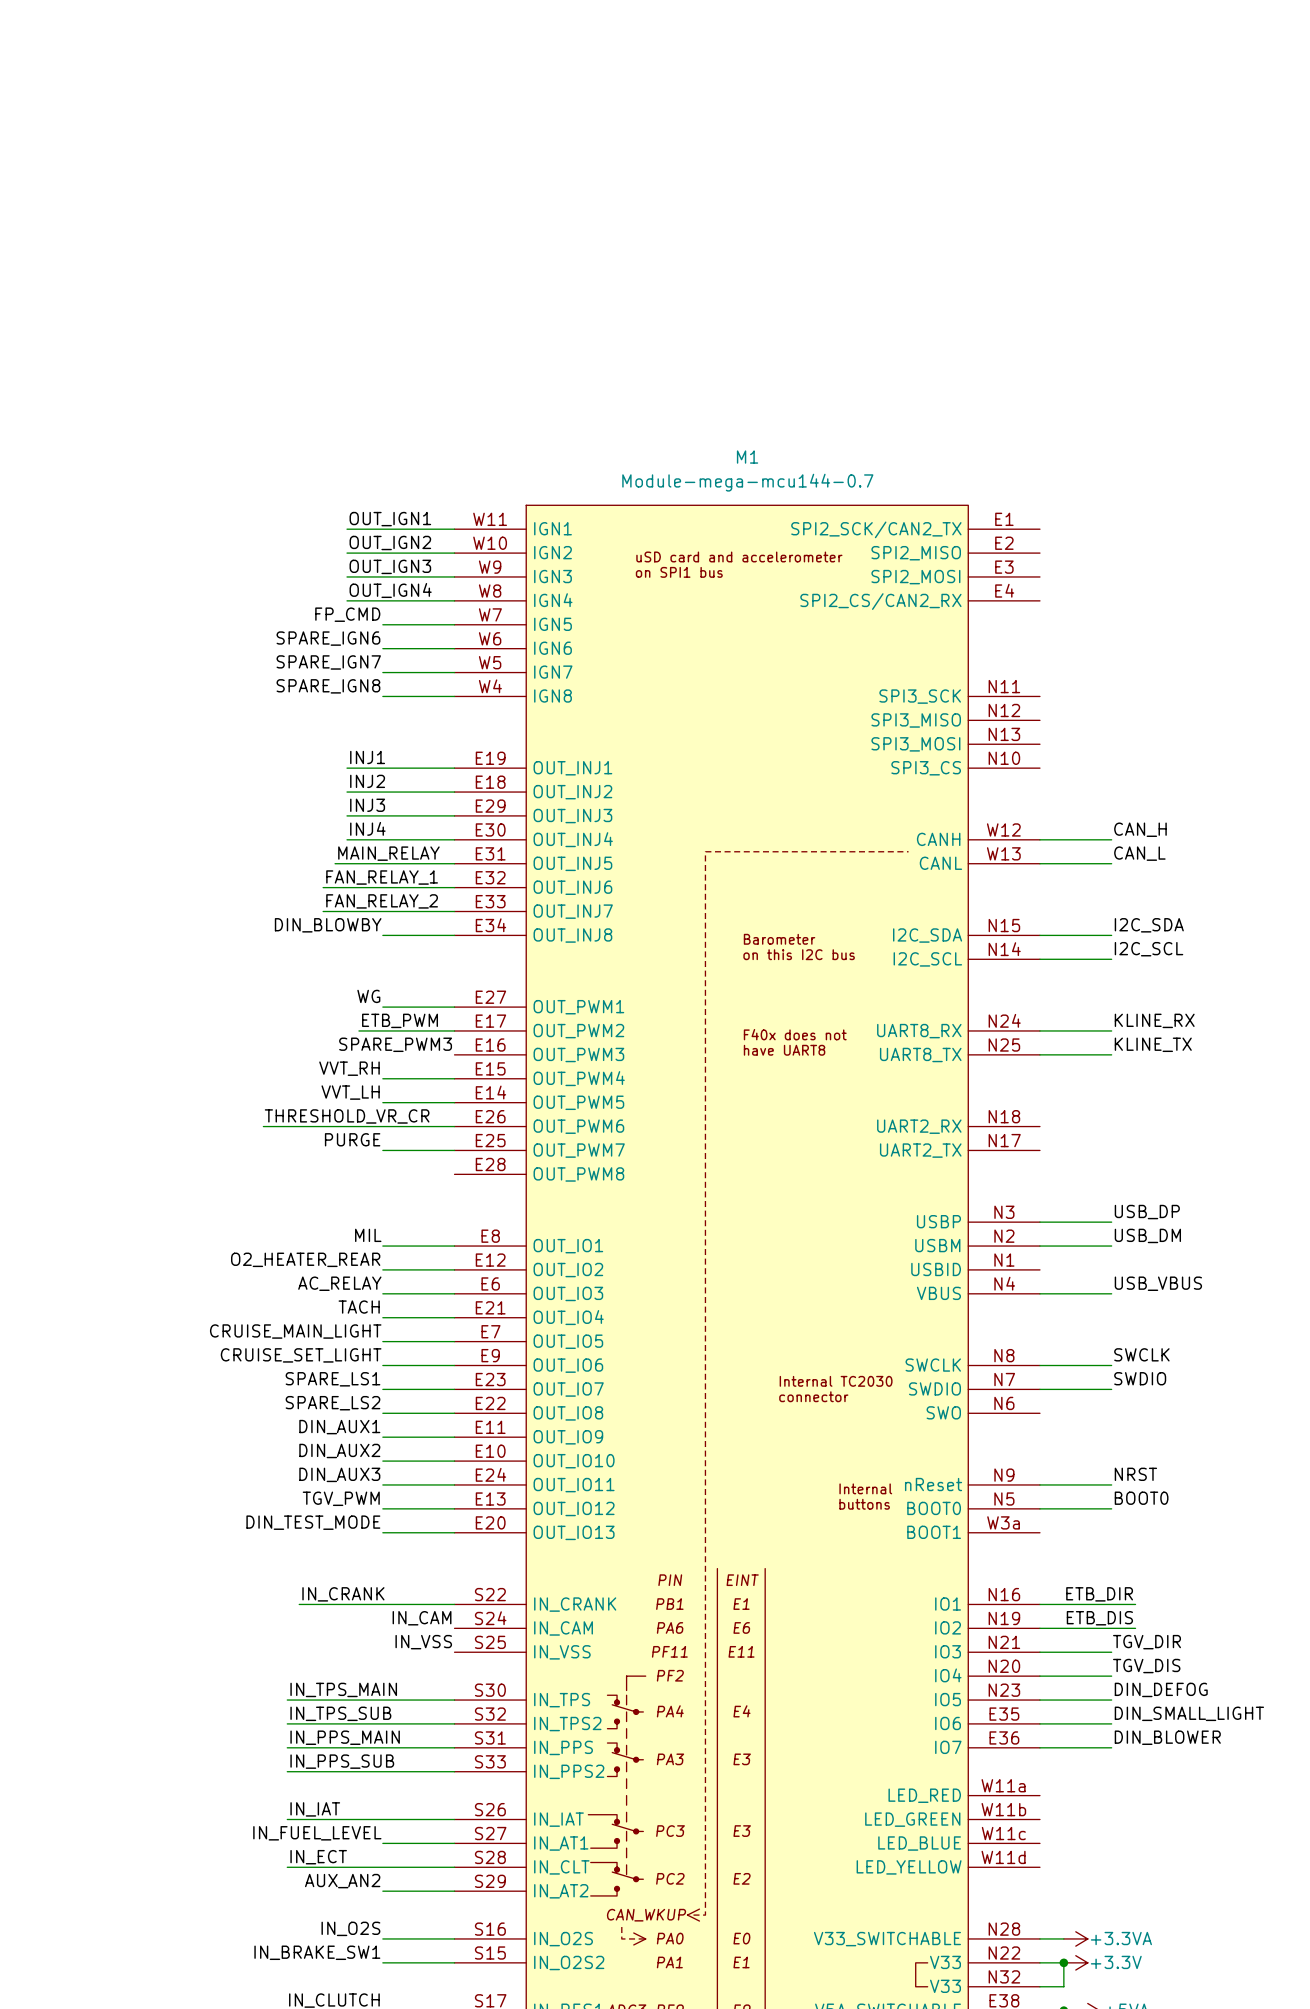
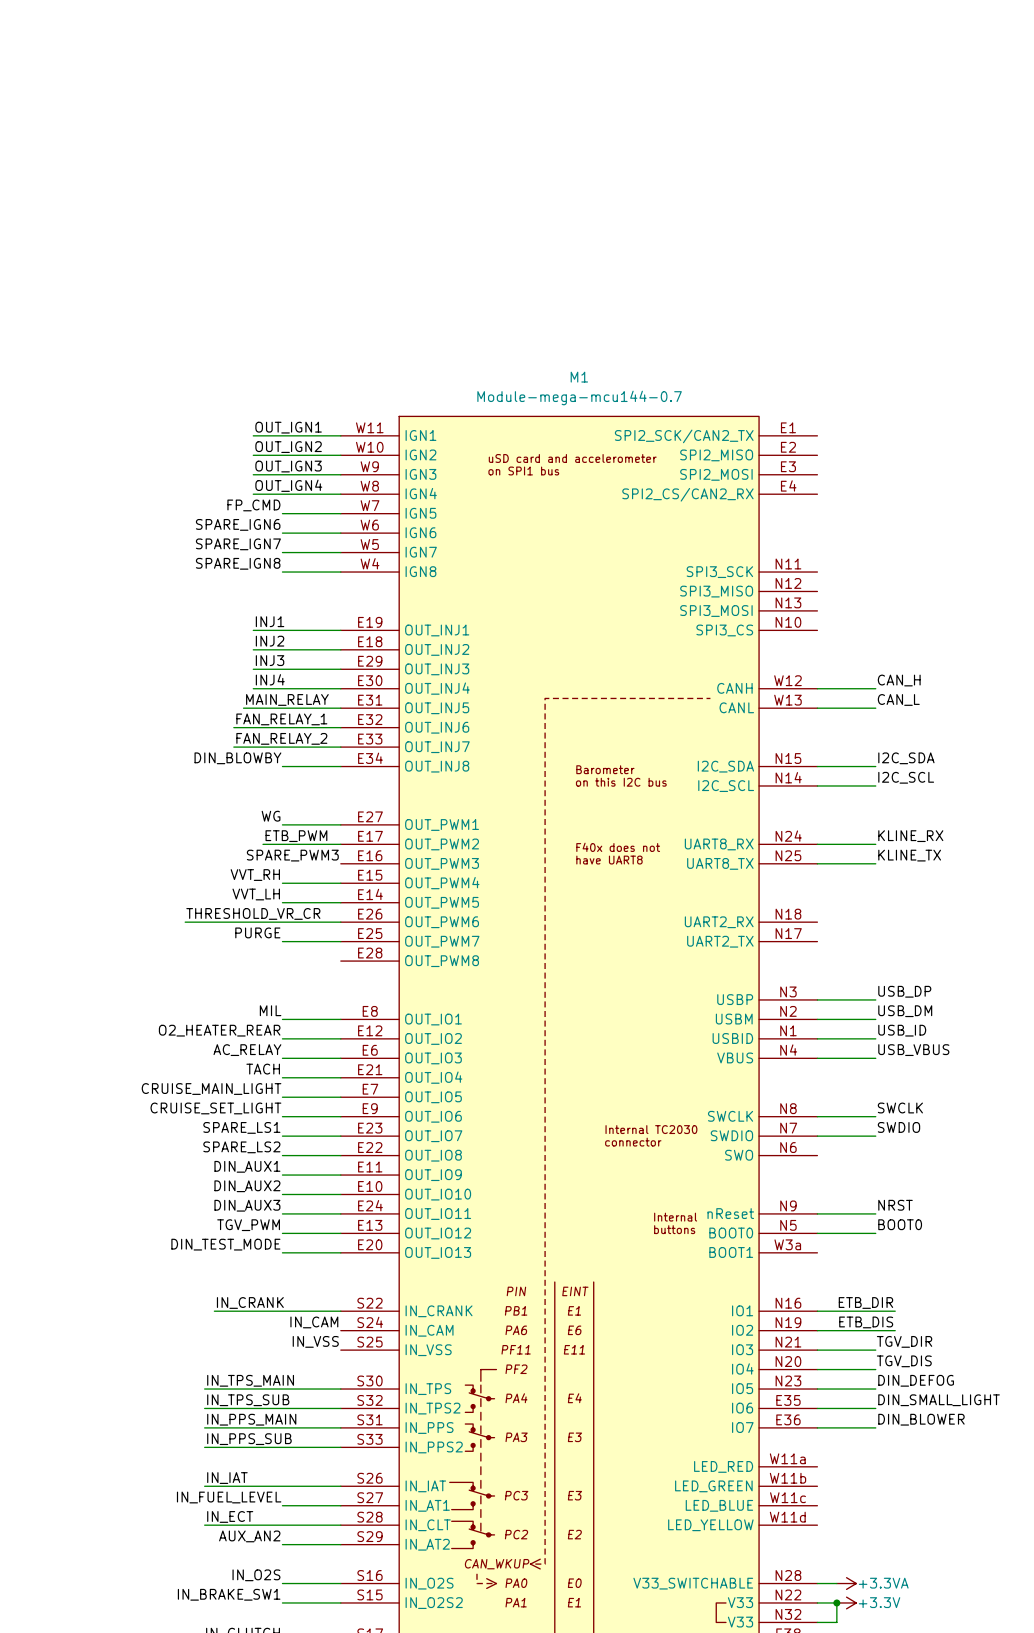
label: none -> USB_ID (902, 1030)
wire: none -> (817, 1038) (875, 1038)

